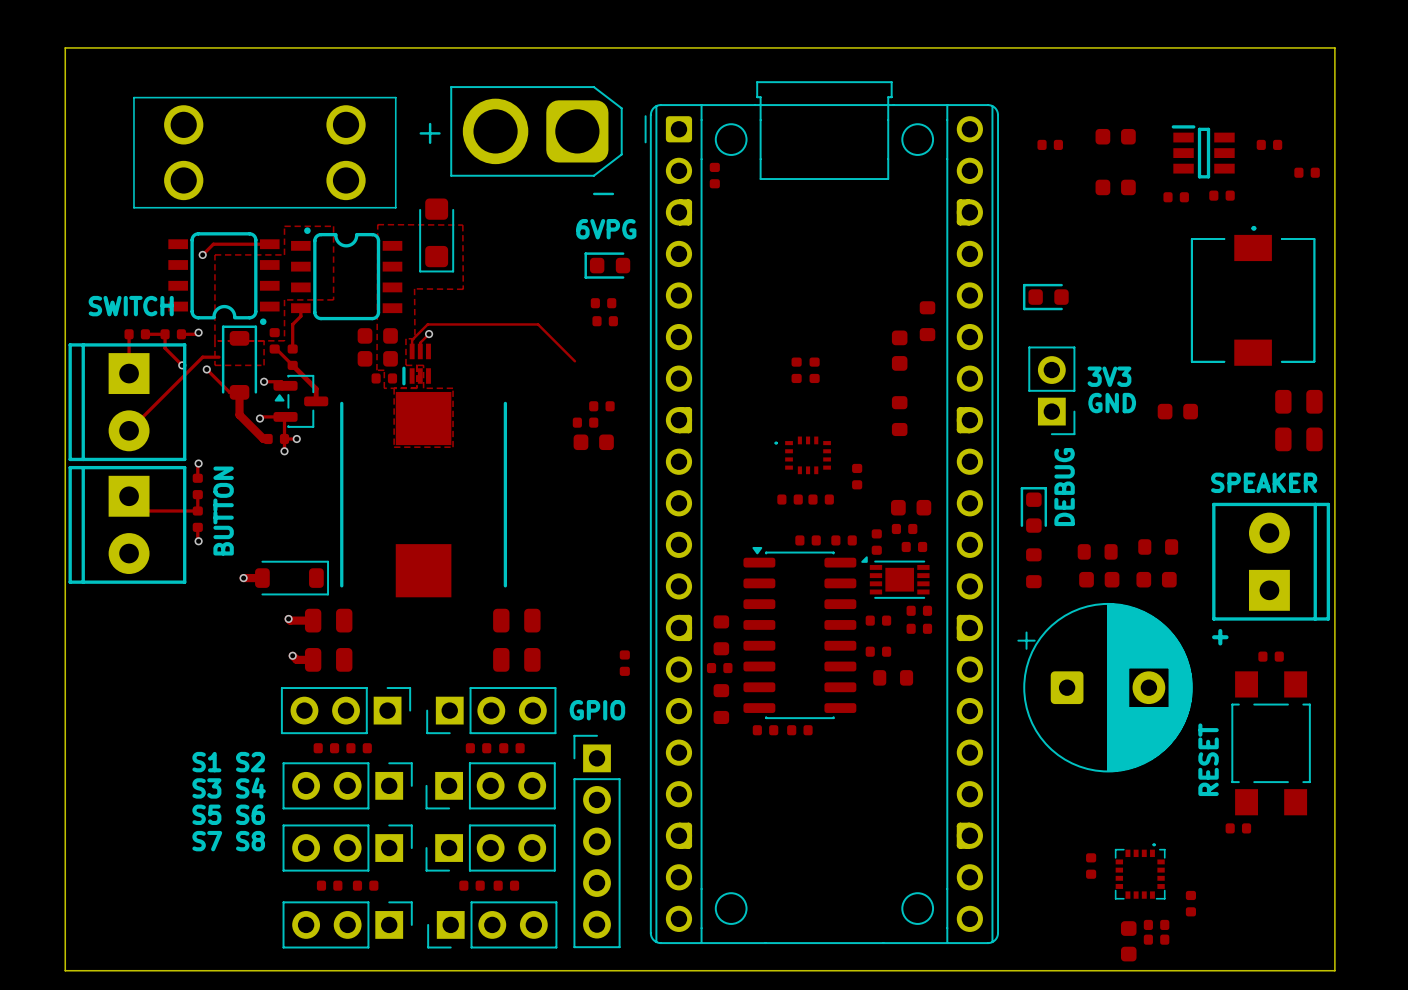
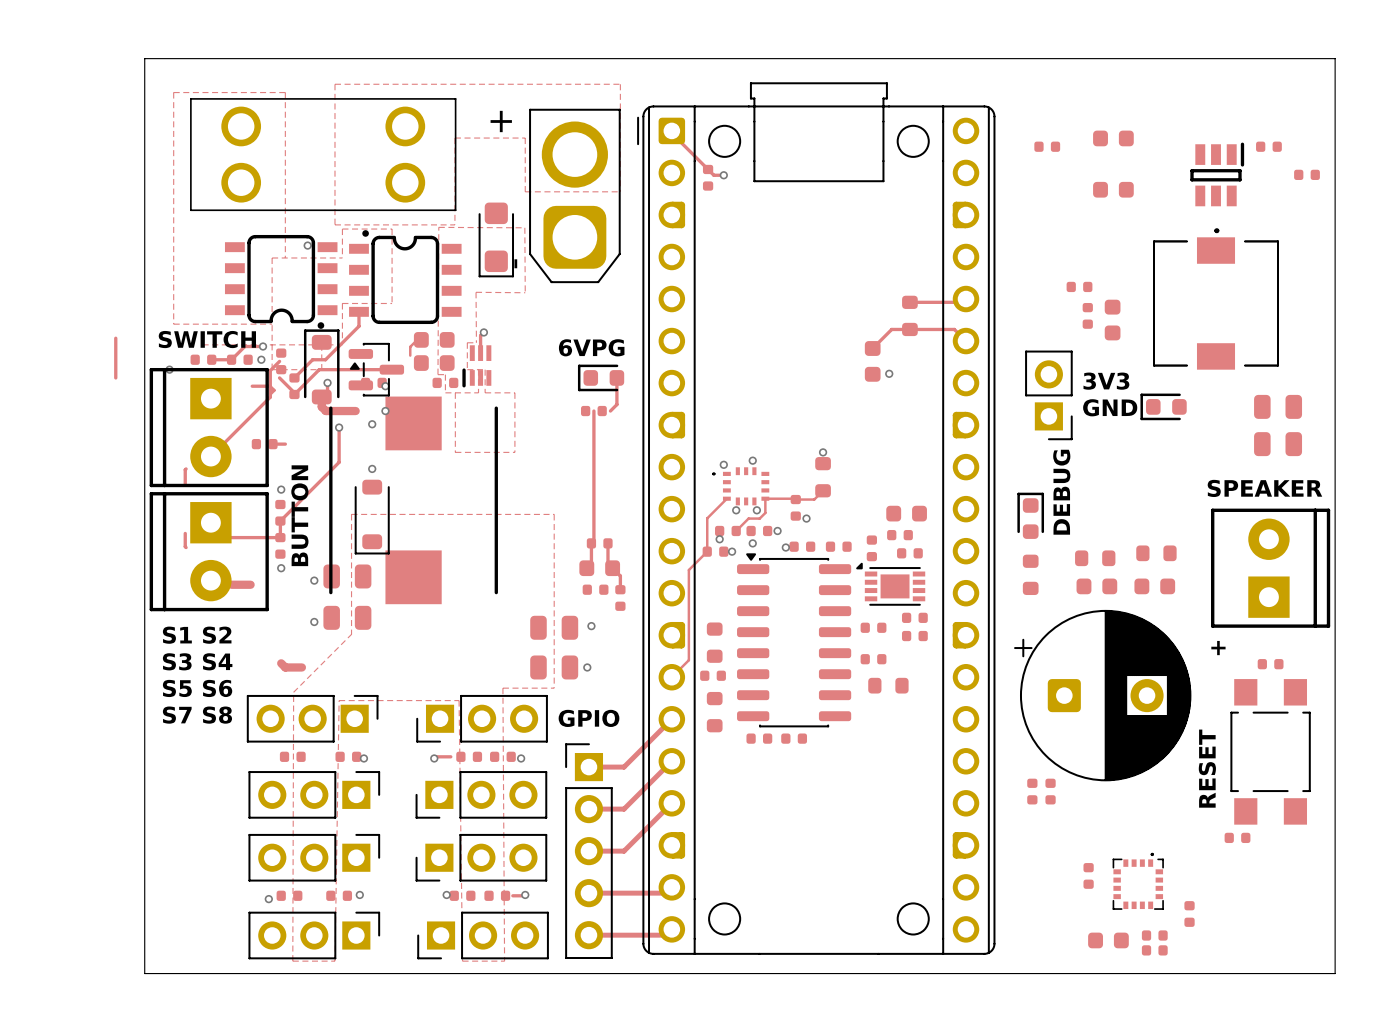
board edge: (1334, 57) (1334, 47) (65, 47) (65, 970) (1334, 970) (1334, 962) -> (1335, 58) (144, 58) (144, 973) (1335, 973)
zone outline: none -> (334, 84) (334, 224) (454, 224) (454, 138) (525, 138) (525, 191) (620, 191) (620, 84) (334, 84)
track: none -> (671, 130) (671, 133) (713, 175) (723, 175)
part: (536, 131) -> none
part rotation: 0° (1203, 151) -> 90° clockwise (1217, 174)
part position: (264, 152) -> (323, 154)
via: none -> (723, 175)
part: none -> (574, 195)
part: (1222, 195) -> none
part: (1176, 197) -> none
text position: 6VPG (606, 229) -> 6VPG (591, 347)
part position: (436, 235) -> (496, 239)
via: none -> (307, 245)
track: (269, 244) (213, 244) (202, 254) -> none
via: (202, 254) -> none
zone outline: (283, 254) (214, 254) (214, 365) (264, 365) (264, 340) -> (272, 257) (272, 369) (321, 369) (321, 344)
zone outline: (284, 254) (284, 226) (333, 226) (333, 299) (284, 299) (284, 340) -> (272, 257) (342, 257) (342, 229) (392, 229) (392, 303) (342, 303) (342, 344) (272, 344)
zone outline: none -> (285, 257) (285, 92) (173, 92) (173, 324) (272, 324)
part position: (607, 265) -> (601, 377)
part: (346, 273) -> none
part: none -> (405, 277)
part: (223, 278) -> none
part: none -> (281, 281)
part: none -> (1079, 286)
track: none -> (966, 299) (962, 302) (909, 302)
part position: (1253, 295) -> (1216, 298)
part: (1045, 297) -> none
part: (603, 303) -> none
text position: SWITCH (131, 306) -> SWITCH (207, 339)
track: (300, 308) (300, 316) (292, 324) (292, 349) -> none
track: none -> (358, 311) (358, 326) (325, 359) (312, 359) (294, 377)
part: none -> (1087, 315)
part: none -> (1112, 320)
part: (605, 321) -> none
part position: (927, 321) -> (909, 315)
track: none -> (483, 332) (480, 335) (480, 353)
via: none -> (483, 332)
track: (198, 332) (181, 334) -> none
via: (198, 332) -> none
part: (137, 334) -> none
track: (145, 334) (165, 334) (165, 348) (182, 365) -> none
part: (173, 334) -> none
via: (429, 334) -> none
part: (377, 335) -> none
part: none -> (434, 339)
track: none -> (966, 341) (954, 329) (891, 329) (872, 348)
part: (274, 340) -> none
track: none -> (263, 346) (244, 346) (231, 359) (211, 359)
via: none -> (263, 346)
track: (274, 349) (316, 388) (316, 401) -> none
part position: (899, 350) -> (872, 361)
part footprint: [357, 351, 398, 367] -> [348, 342, 405, 397]
track: (412, 351) (412, 340) (427, 324) (538, 324) (574, 361) -> none
part: none -> (203, 359)
part: none -> (239, 359)
via: none -> (261, 359)
track: (219, 357) (202, 357) (129, 430) -> none
track: none -> (279, 361) (270, 370) (270, 397) (210, 456)
part: none -> (434, 363)
part position: (239, 362) -> (321, 366)
part position: (416, 364) -> (476, 366)
track: none -> (391, 369) (319, 369) (294, 394) (279, 377)
zone outline: (417, 365) (417, 388) (384, 388) (384, 370) (376, 370) (377, 224) (462, 225) (463, 289) (414, 288) (414, 338) (405, 338) (405, 365) (423, 365) (423, 388) (453, 388) (453, 447) (394, 447) (394, 388) -> (478, 369) (478, 392) (445, 392) (445, 374) (437, 374) (438, 227) (524, 227) (525, 292) (476, 292) (476, 342) (467, 342) (467, 369) (485, 369) (485, 392) (514, 392) (514, 452) (455, 452) (455, 392)
track: (206, 369) (229, 392) (239, 392) (239, 414) (263, 439) (268, 439) -> none
via: (206, 369) -> none
via: none -> (889, 373)
part: (796, 370) -> none
part: (814, 370) -> none
track: none -> (616, 377) (616, 404) (610, 411)
track: none -> (327, 382) (327, 391) (321, 396) (321, 406) (325, 411) (355, 411)
via: none -> (327, 382)
part: none -> (445, 382)
via: (264, 381) -> none
part: none -> (294, 386)
via: none -> (385, 386)
part: (300, 401) -> none
part position: (1298, 401) -> (1278, 406)
part: (127, 402) -> none
part footprint: [1157, 403, 1198, 420] -> [1140, 393, 1187, 421]
via: none -> (385, 411)
track: none -> (593, 411) (593, 540) (591, 543) (591, 563) (586, 568)
part position: (899, 416) -> (823, 477)
track: (259, 418) (261, 416) (285, 416) (284, 451) -> none
via: (259, 418) -> none
via: none -> (372, 424)
part: none -> (209, 427)
track: none -> (339, 427) (339, 462) (280, 521) (280, 537) (225, 537) (210, 522)
via: none -> (339, 427)
part: (585, 422) -> none
via: (296, 439) -> none
part position: (1298, 439) -> (1278, 444)
part: (593, 442) -> none
via: none -> (823, 452)
via: (284, 451) -> none
via: none -> (752, 460)
part position: (802, 455) -> (740, 486)
via: none -> (723, 464)
via: (198, 463) -> none
via: none -> (372, 468)
part: (857, 476) -> none
via: none -> (281, 489)
track: none -> (823, 490) (814, 499) (765, 498) (765, 512) (759, 518) (748, 518) (736, 530)
part: (197, 486) -> none
track: none -> (726, 498) (707, 518) (707, 551) (688, 570) (688, 660) (671, 677)
track: (197, 494) (197, 510) (143, 510) (129, 496) -> none
part: (790, 499) -> none
part: (821, 499) -> none
part: none -> (795, 507)
via: none -> (736, 510)
via: none -> (756, 510)
part: none -> (280, 512)
zone outline: none -> (351, 514) (351, 634) (293, 692) (292, 961) (334, 961) (339, 700) (459, 700) (462, 961) (504, 961) (502, 688) (554, 688) (554, 514) (351, 514)
text position: BUTTON (223, 511) -> BUTTON (299, 515)
via: none -> (806, 518)
part: (197, 519) -> none
part: (127, 524) -> none
part: none -> (727, 530)
part: none -> (759, 530)
via: none -> (777, 530)
via: none -> (719, 539)
part: none -> (599, 543)
track: none -> (607, 543) (607, 563) (620, 575) (620, 589)
via: none -> (752, 543)
part: none -> (280, 545)
via: (198, 541) -> none
via: none -> (785, 547)
part: none -> (209, 551)
part: none -> (715, 551)
via: none -> (732, 551)
via: none -> (281, 568)
part: none -> (599, 568)
part: none -> (347, 576)
via: none -> (314, 580)
via: (243, 578) -> none
part rotation: 0° (292, 578) -> 90° clockwise (372, 517)
part position: (292, 578) -> (372, 517)
part: none -> (595, 589)
part: none -> (620, 597)
part: none -> (347, 617)
via: none -> (314, 621)
track: (288, 618) (290, 620) (313, 620) -> none
via: (288, 618) -> none
via: none -> (591, 626)
part: (328, 620) -> none
part: (516, 620) -> none
part: none -> (554, 627)
via: (292, 655) -> none
part: (328, 659) -> none
part: (516, 659) -> none
part: none -> (554, 667)
via: none -> (587, 667)
part: (624, 663) -> none
part position: (346, 710) -> (312, 718)
track: none -> (671, 719) (624, 767) (588, 767)
part position: (326, 748) -> (292, 756)
track: none -> (450, 756) (434, 758)
via: none -> (363, 758)
via: none -> (434, 758)
via: none -> (521, 758)
track: none -> (671, 761) (624, 809) (588, 809)
text position: S1 S2 (228, 762) -> S1 S2 (197, 635)
part: none -> (1032, 791)
part: none -> (1050, 791)
part position: (347, 785) -> (314, 794)
text position: S3 S4 (229, 788) -> S3 S4 (197, 661)
track: none -> (671, 803) (624, 851) (588, 851)
text position: S5 S6 (228, 814) -> S5 S6 (197, 688)
text position: S7 S8 (228, 841) -> S7 S8 (197, 715)
part position: (347, 848) -> (314, 857)
track: none -> (671, 887) (666, 893) (588, 893)
via: none -> (359, 894)
via: none -> (446, 894)
track: none -> (525, 894) (512, 895)
via: none -> (525, 894)
part: none -> (289, 895)
part: (329, 885) -> none
part: none -> (339, 895)
part: (365, 885) -> none
via: none -> (268, 899)
track: none -> (671, 929) (666, 935) (588, 935)
part position: (347, 924) -> (314, 935)
part rotation: 0° (1128, 941) -> 90° clockwise (1108, 940)

